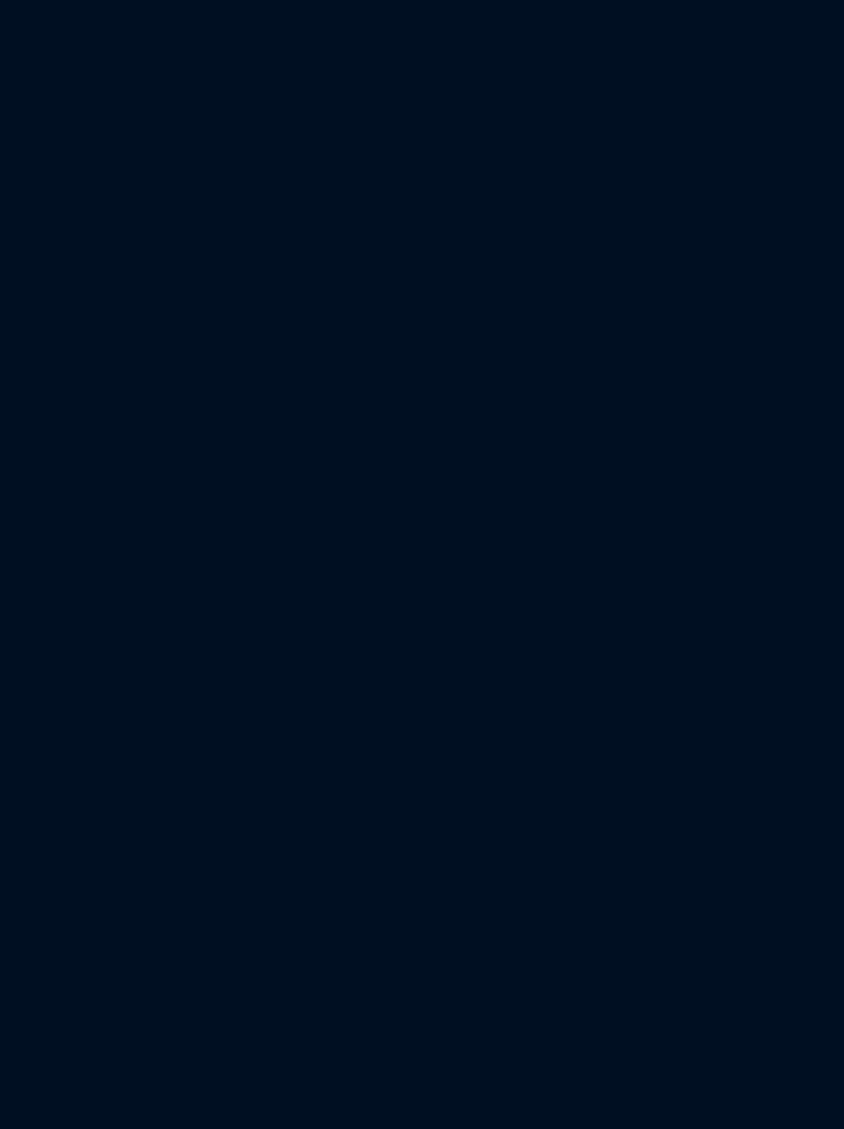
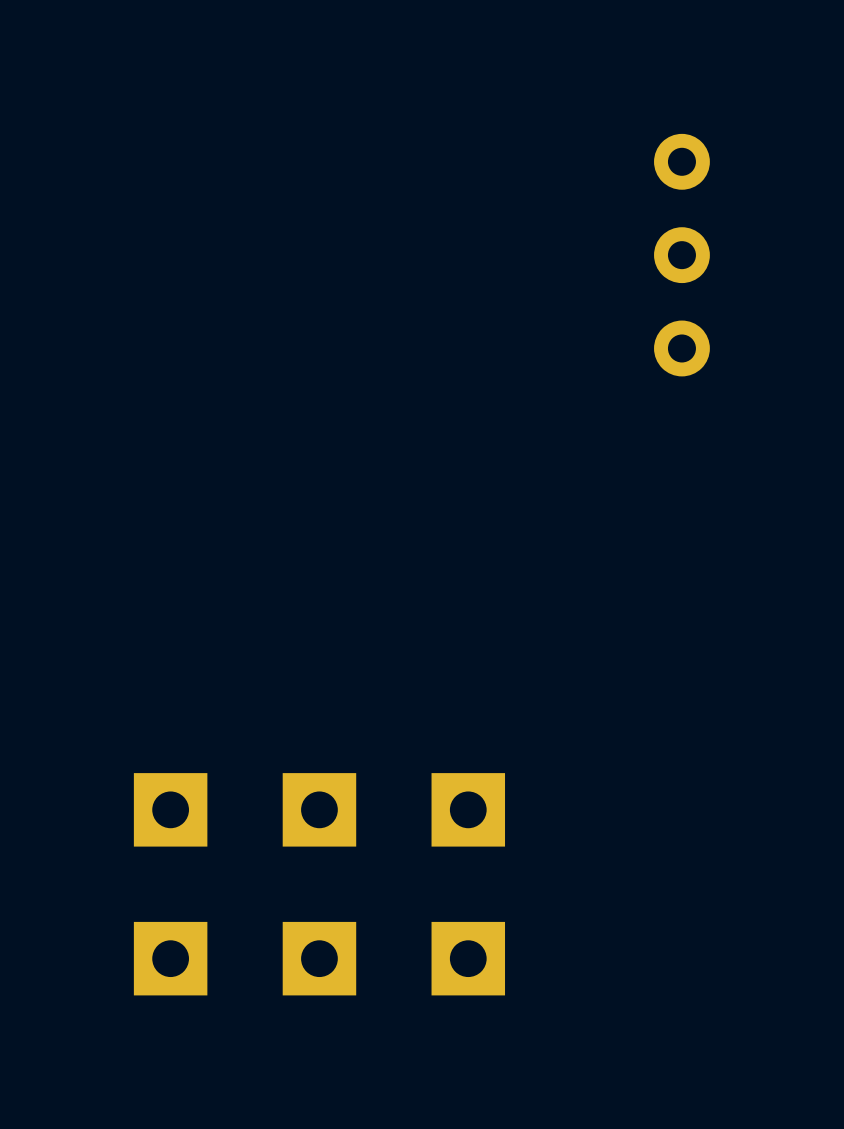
part: none -> (681, 255)
part: none -> (170, 809)
part: none -> (319, 809)
part: none -> (468, 809)
part: none -> (170, 958)
part: none -> (319, 958)
part: none -> (468, 958)

